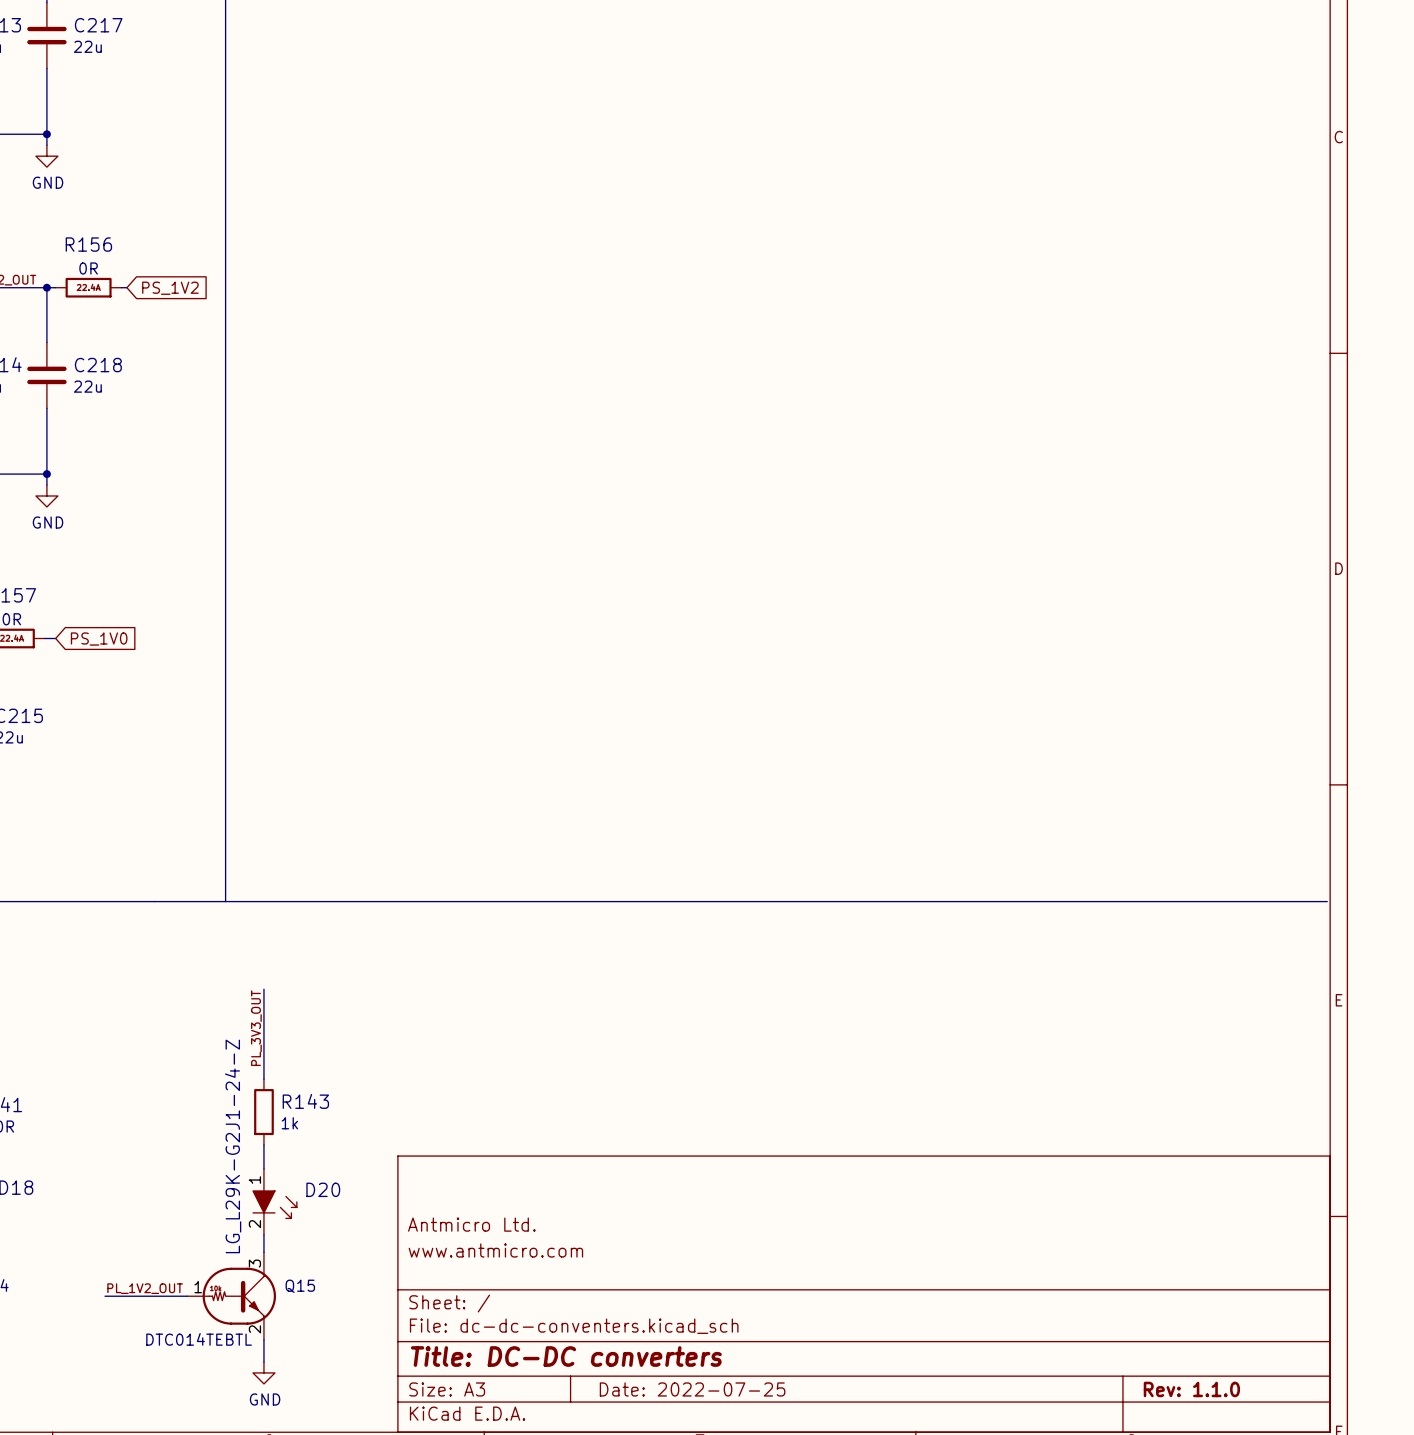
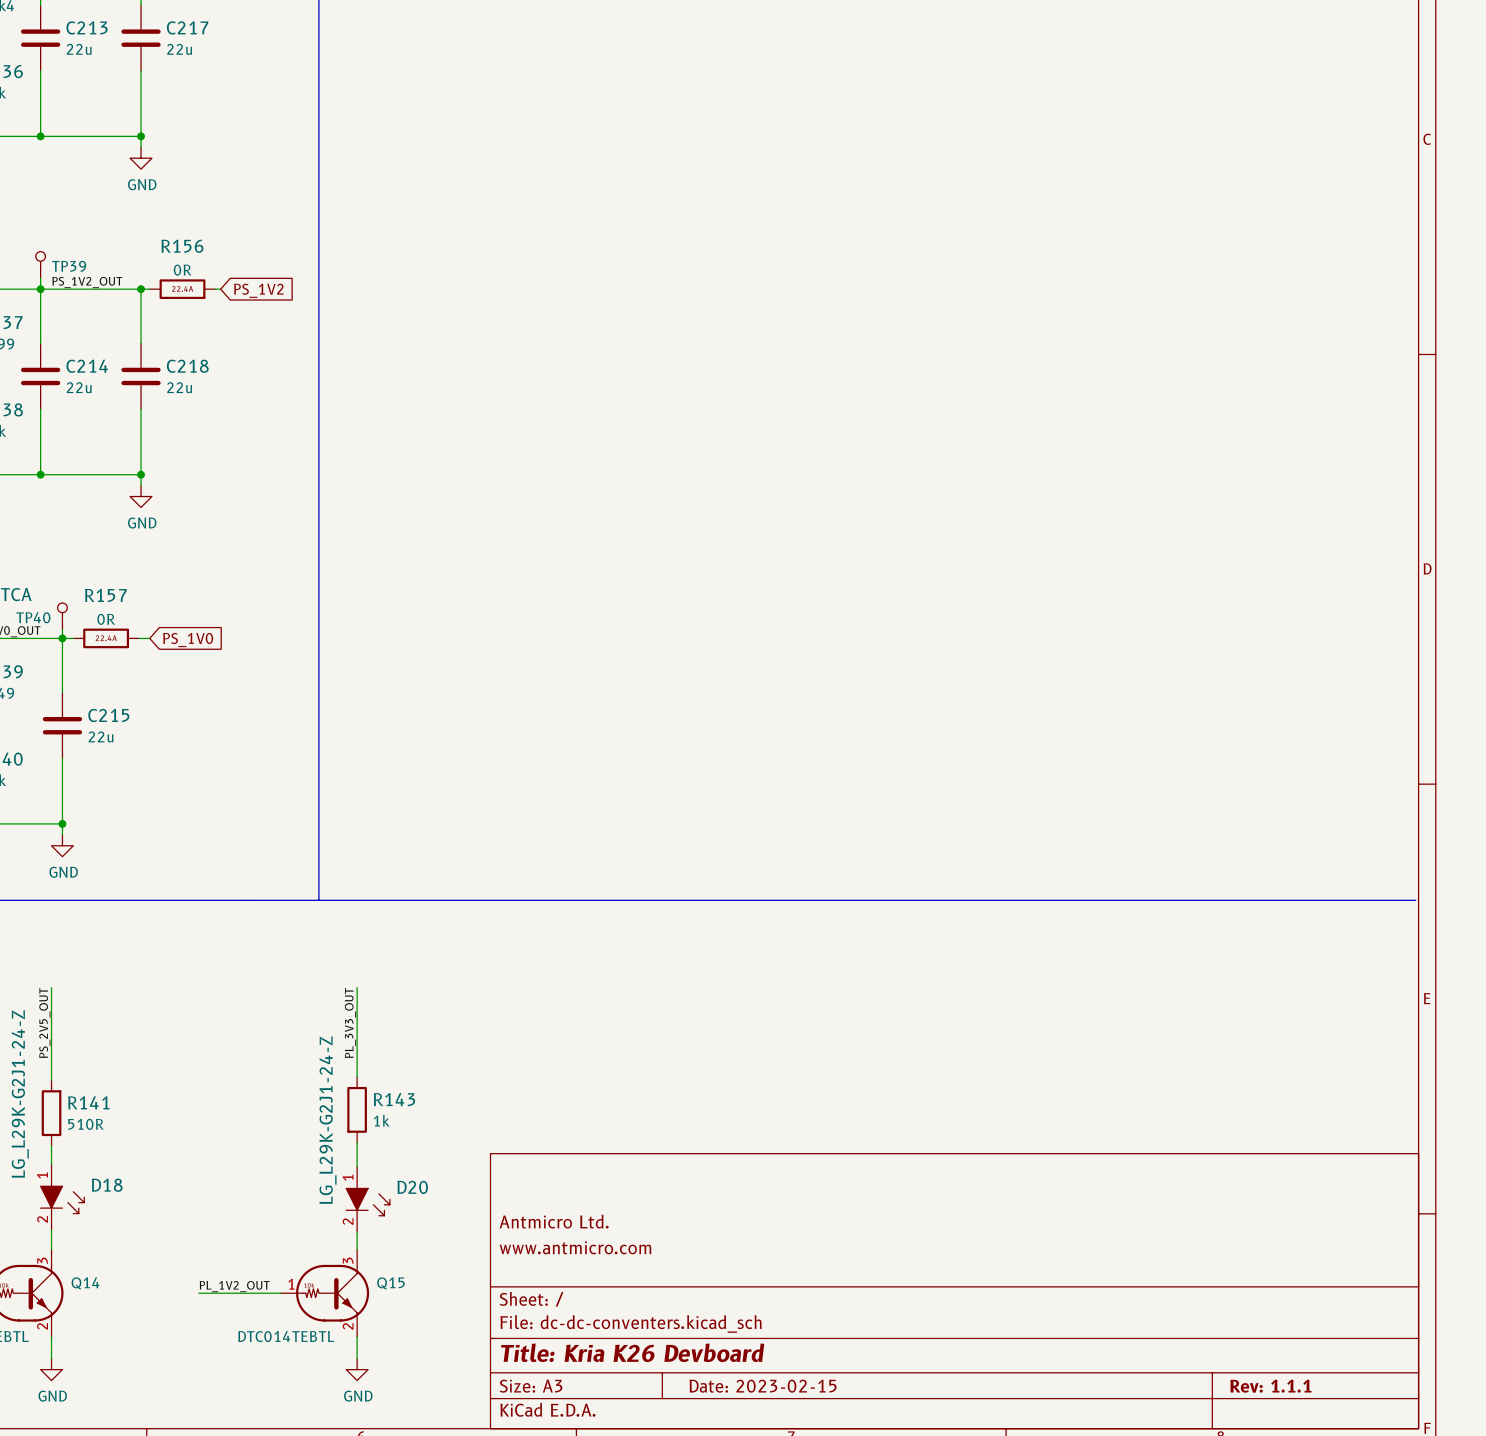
title block: Title: DC-DC converters (566, 1356) -> Title: Kria K26 Devboard (632, 1352)
title block: Date: 2022-07-25 (692, 1389) -> Date: 2023-02-15 (763, 1386)
title block: Rev: 1.1.0 (1191, 1389) -> Rev: 1.1.1 (1270, 1386)

